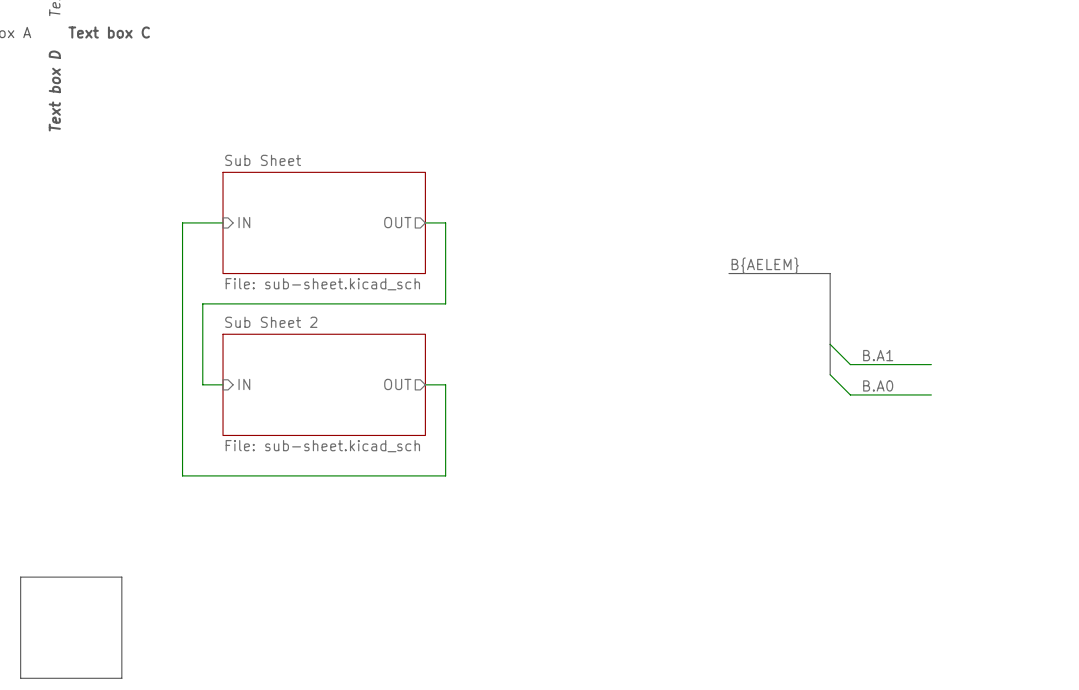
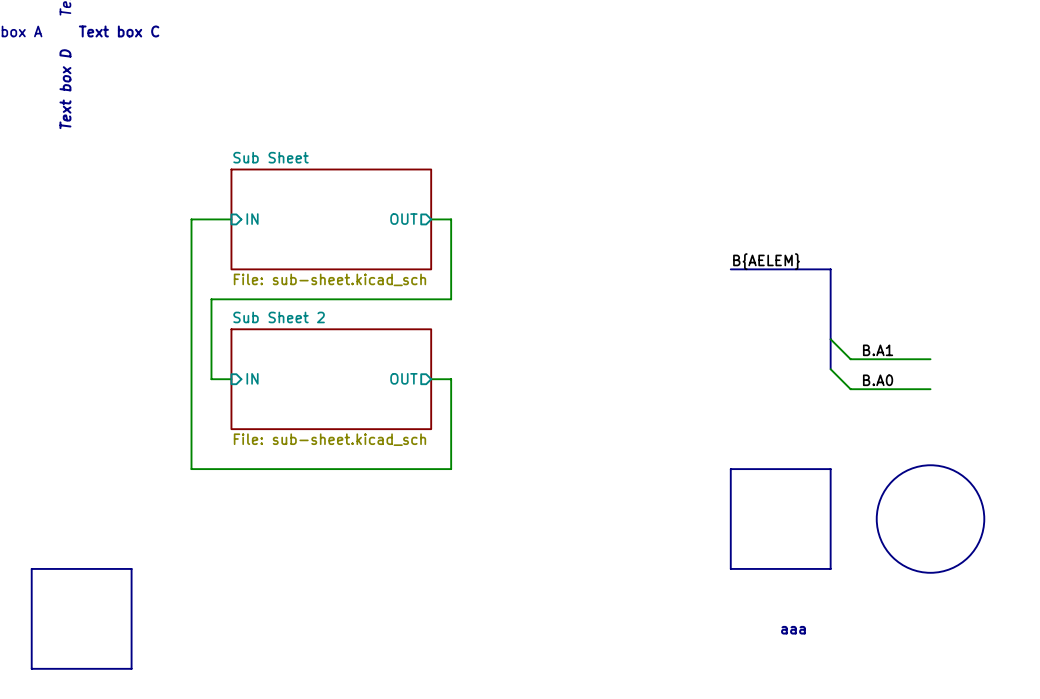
drawing: none -> [876, 465, 985, 573]
line: none -> (730, 469) (830, 469) (830, 568) (730, 568) (730, 469)
text: none -> aaa (793, 630)

